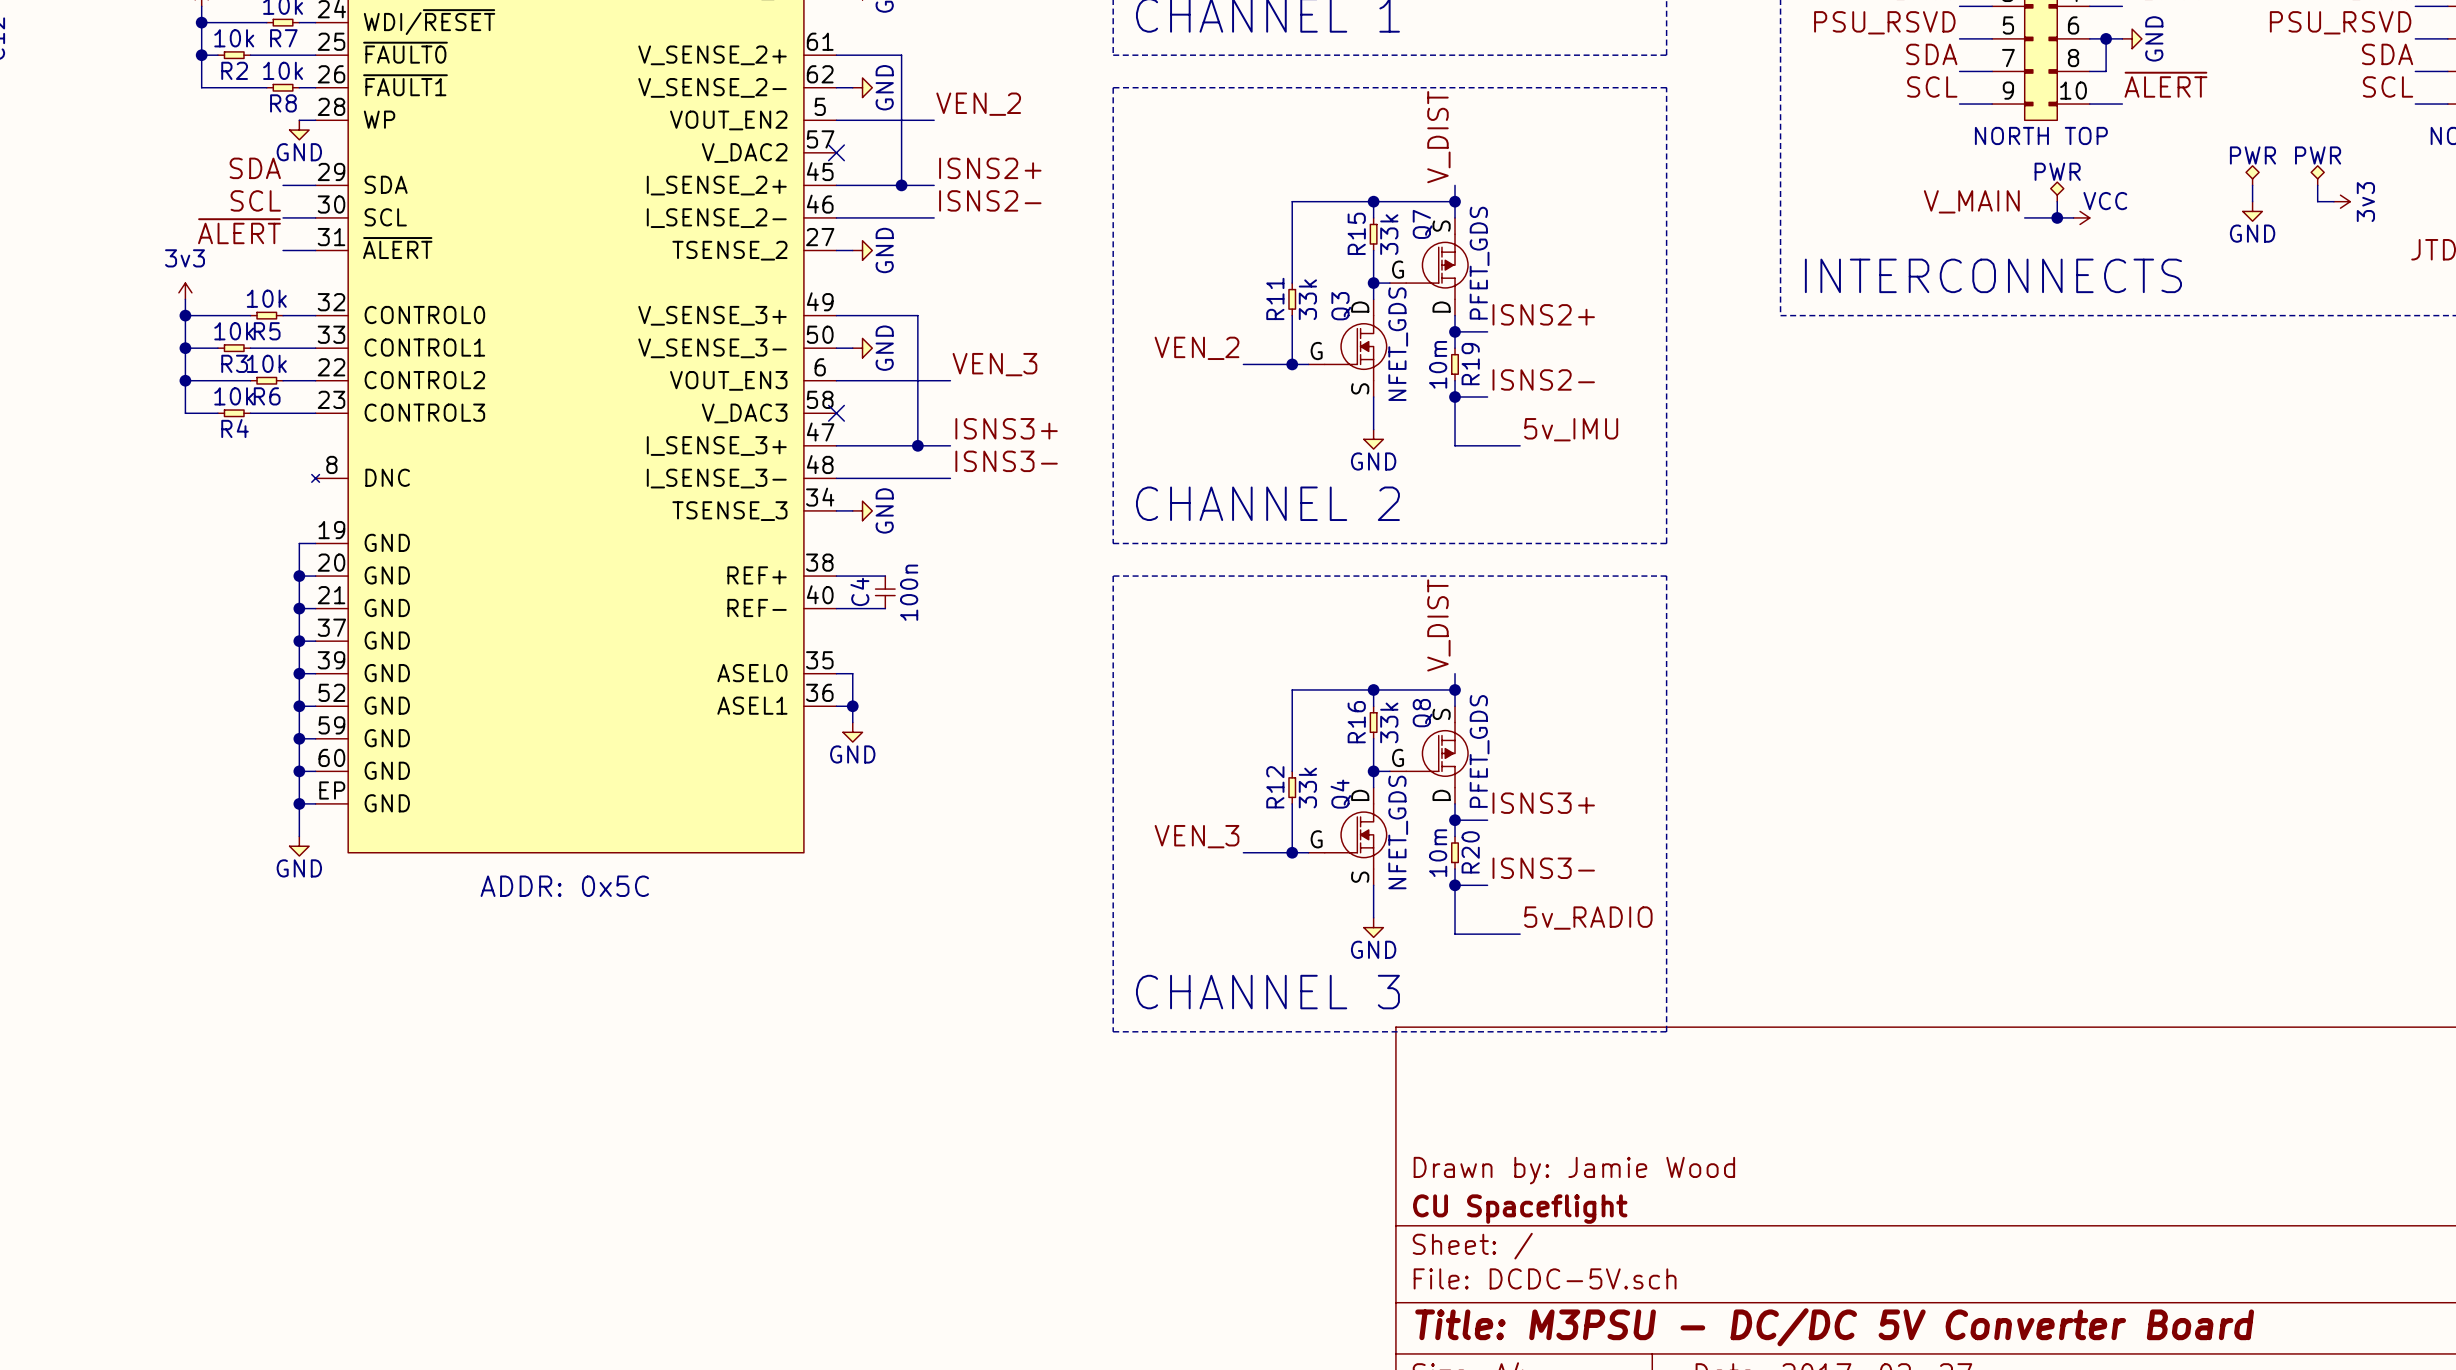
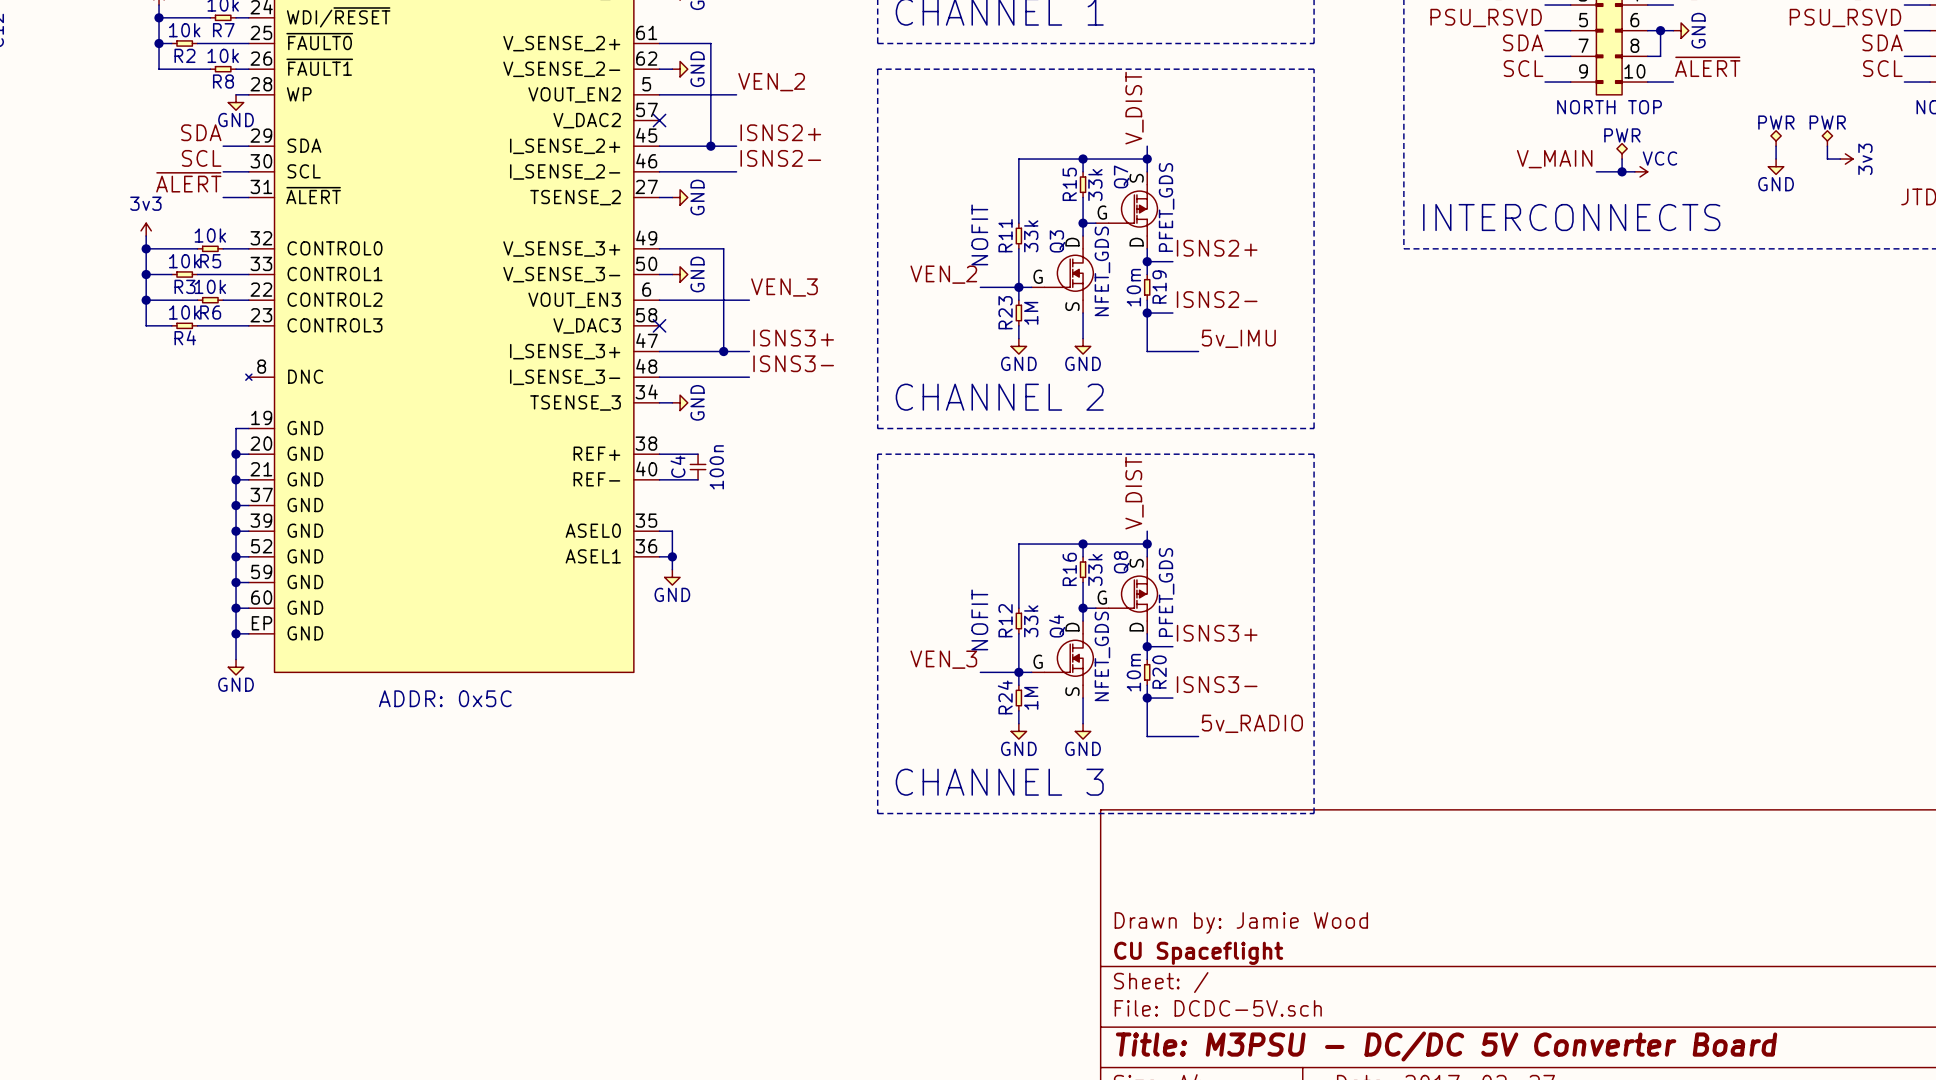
R11 text: none -> NOFIT (979, 234)
wire: none -> (1018, 287) (1018, 300)
R23: none -> 1M (1018, 313)
wire: none -> (1018, 325) (1018, 338)
power symbol: none -> GND (1018, 346)
R12 text: none -> NOFIT (979, 619)
wire: none -> (1018, 672) (1018, 685)
R24: none -> 1M (1018, 698)
wire: none -> (1018, 710) (1018, 723)
power symbol: none -> GND (1018, 731)

